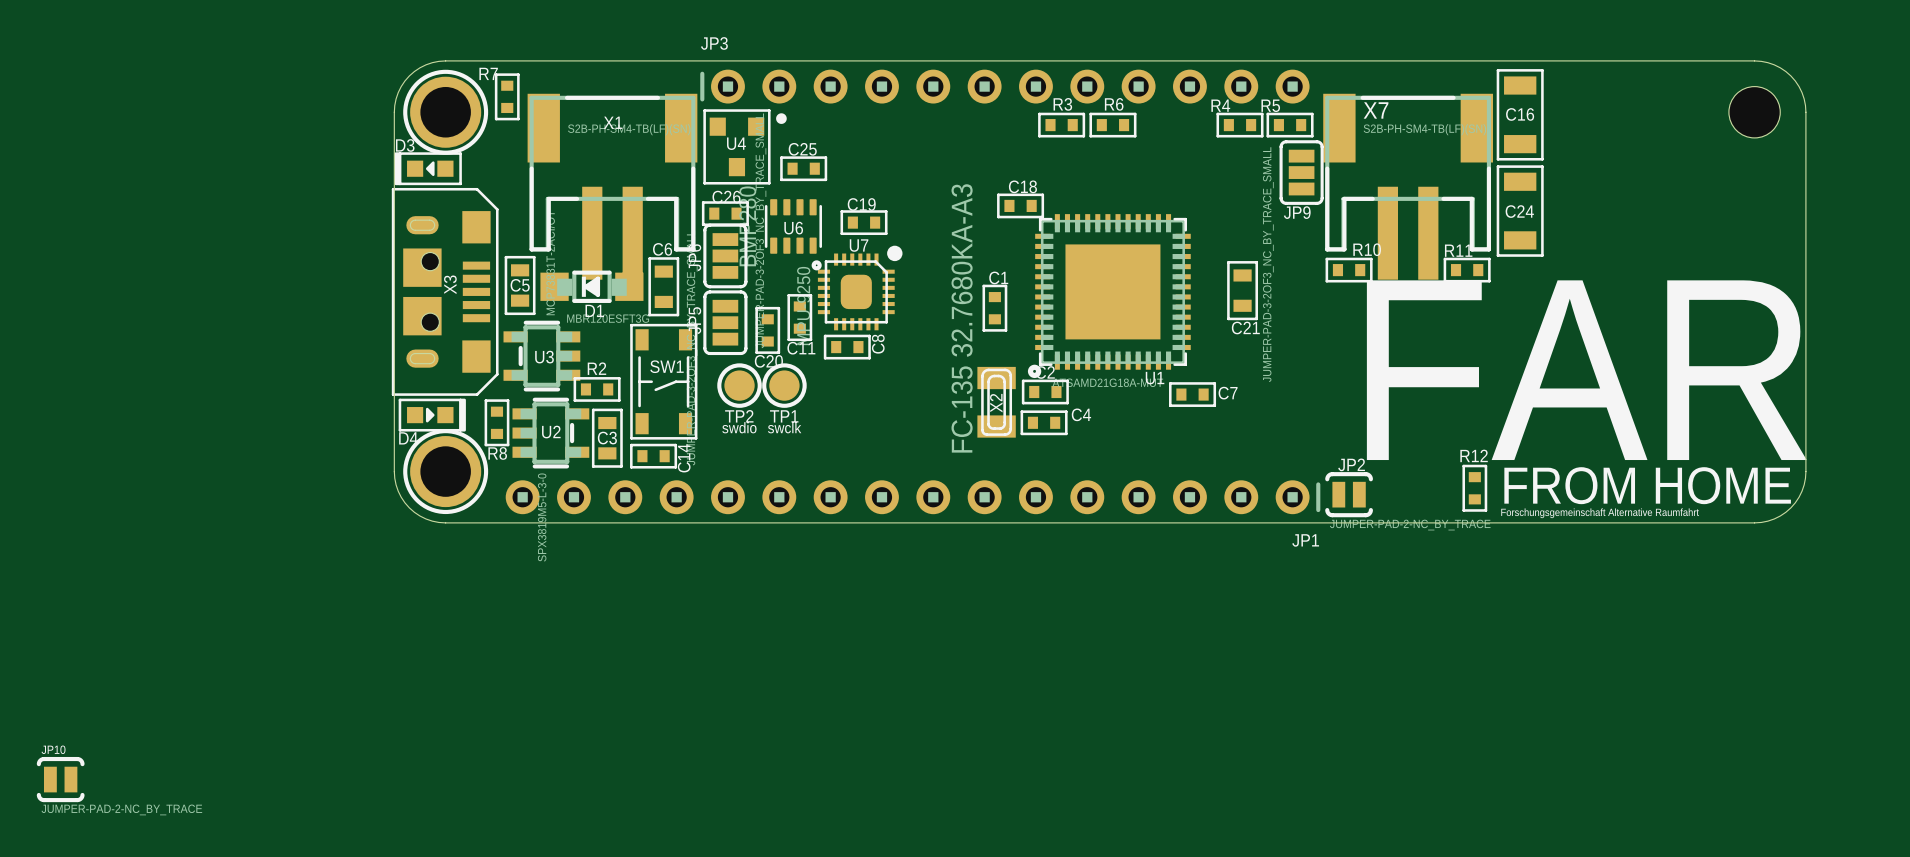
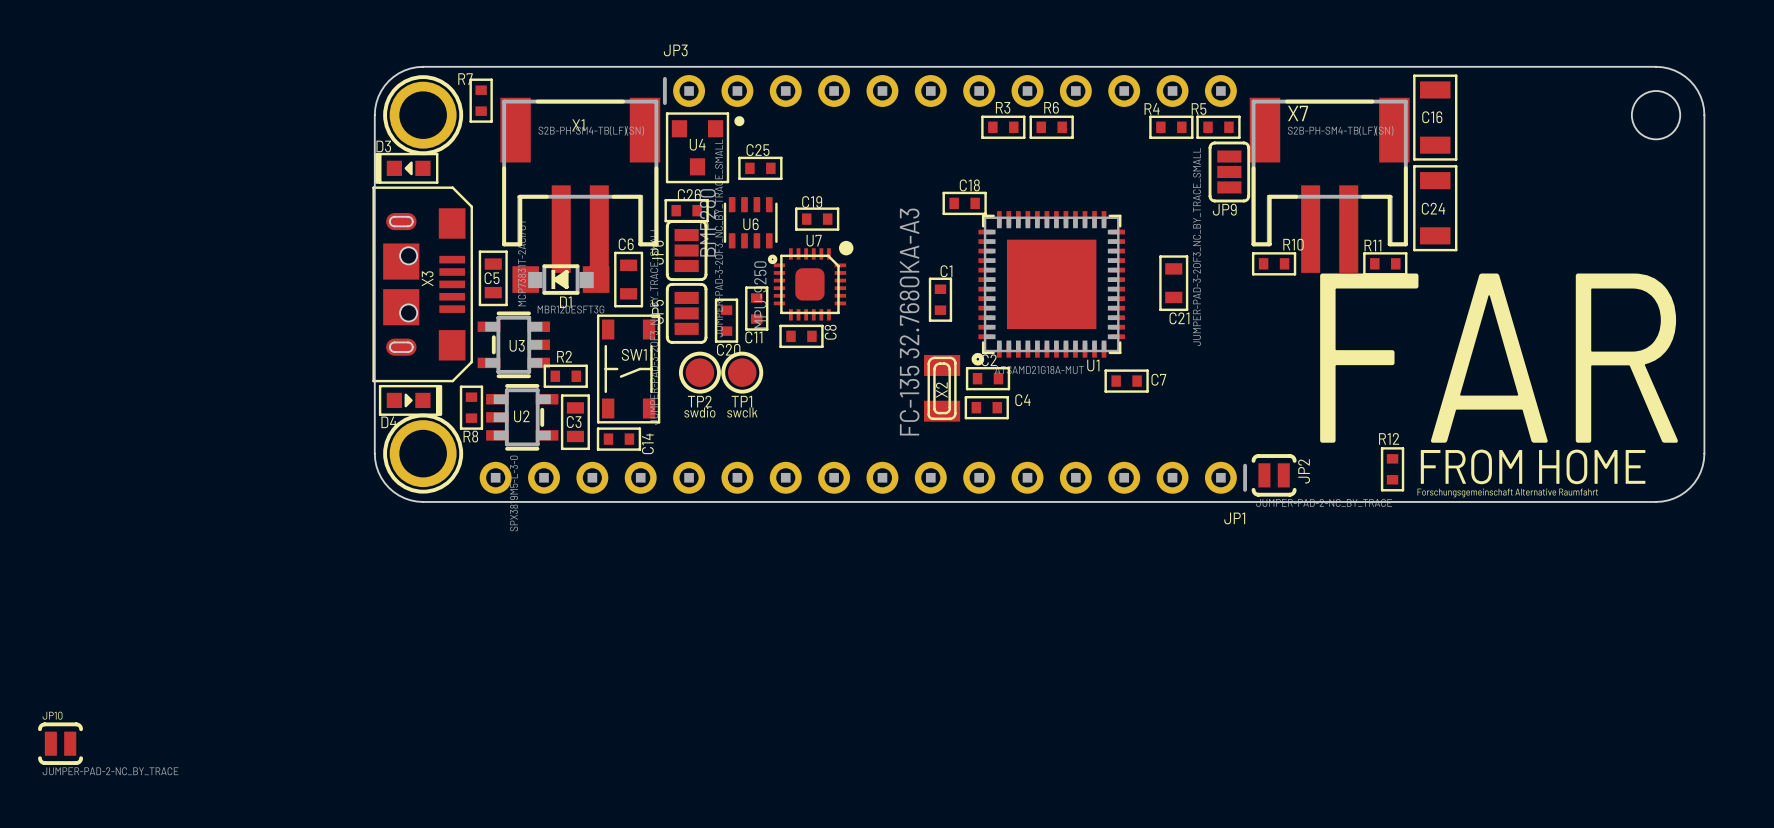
JP2 name rotation: 0° (1351, 464) -> 90° counterclockwise (1304, 471)
JP2 name position: JP2 (1351, 464) -> JP2 (1304, 471)

